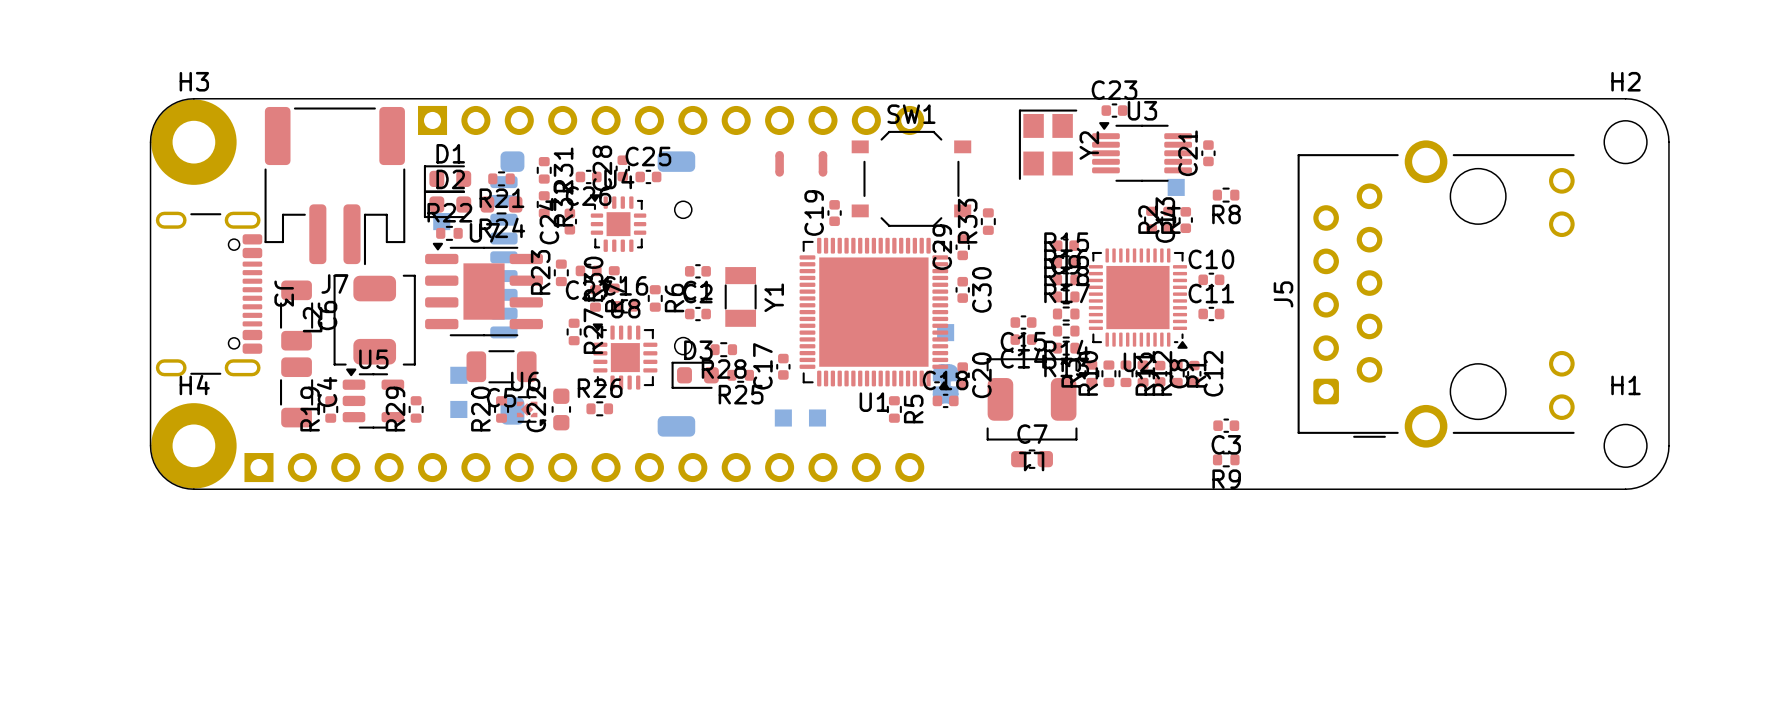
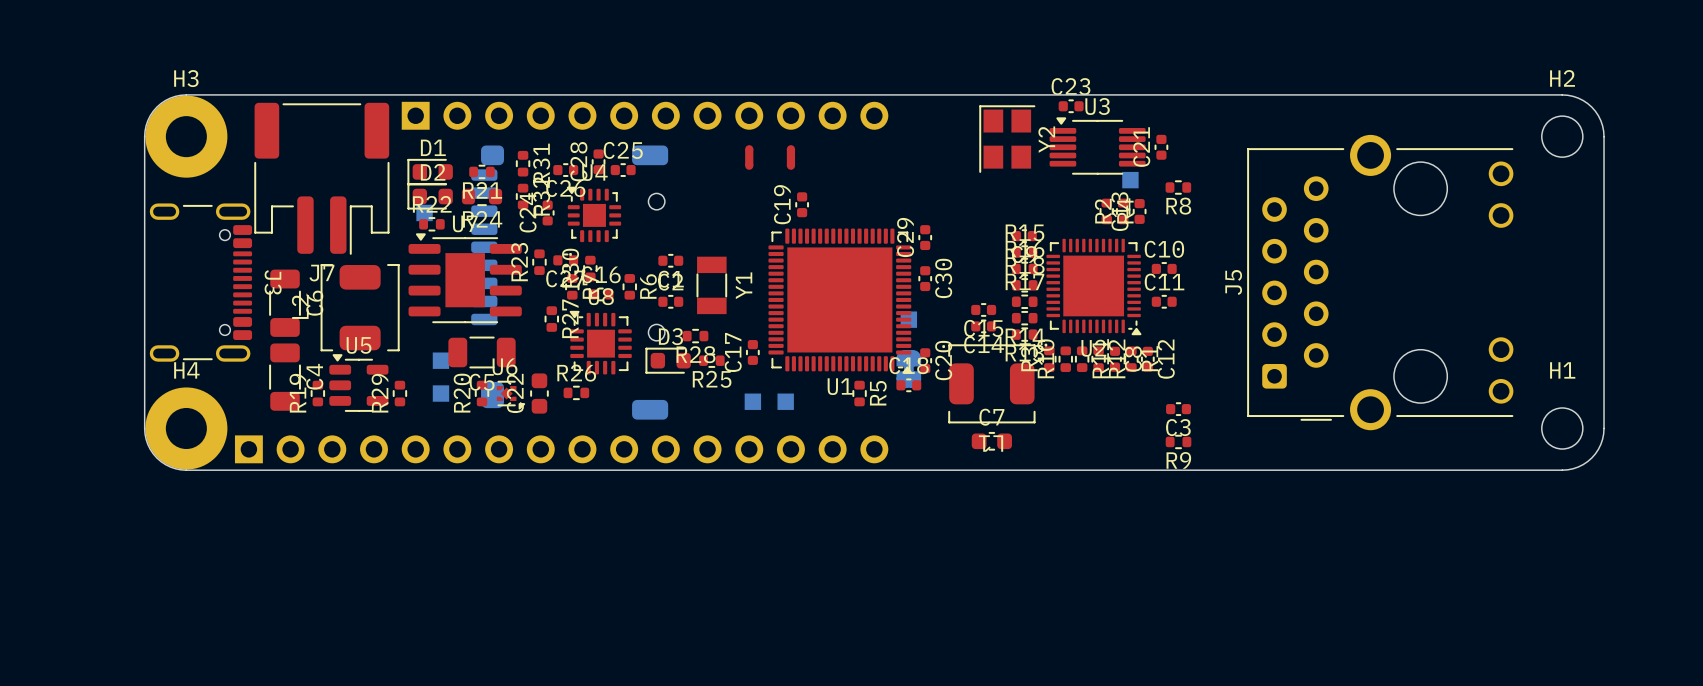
SW1: (911, 178) -> none
R33: (988, 221) -> none

